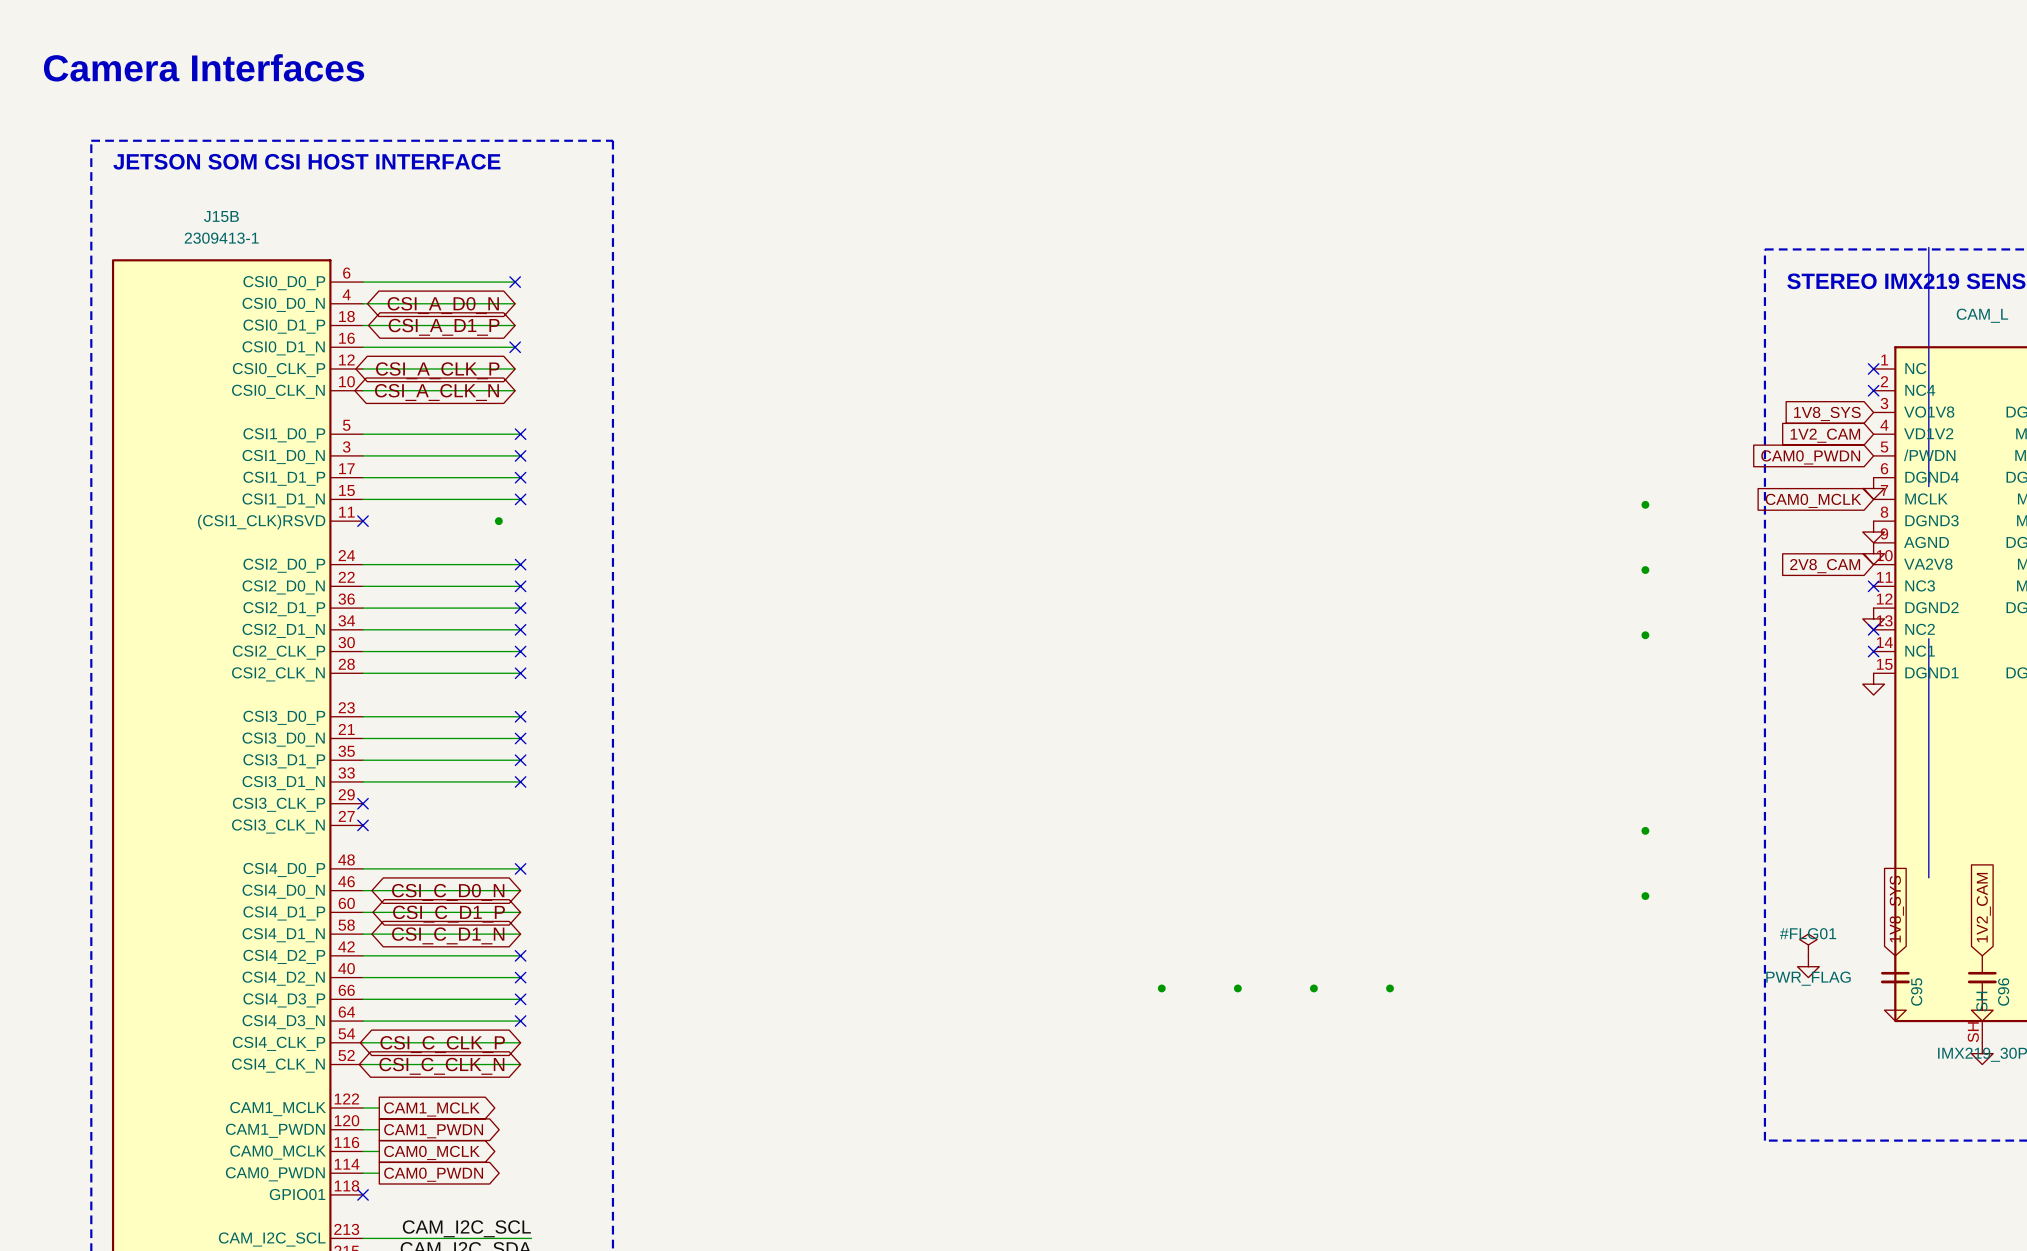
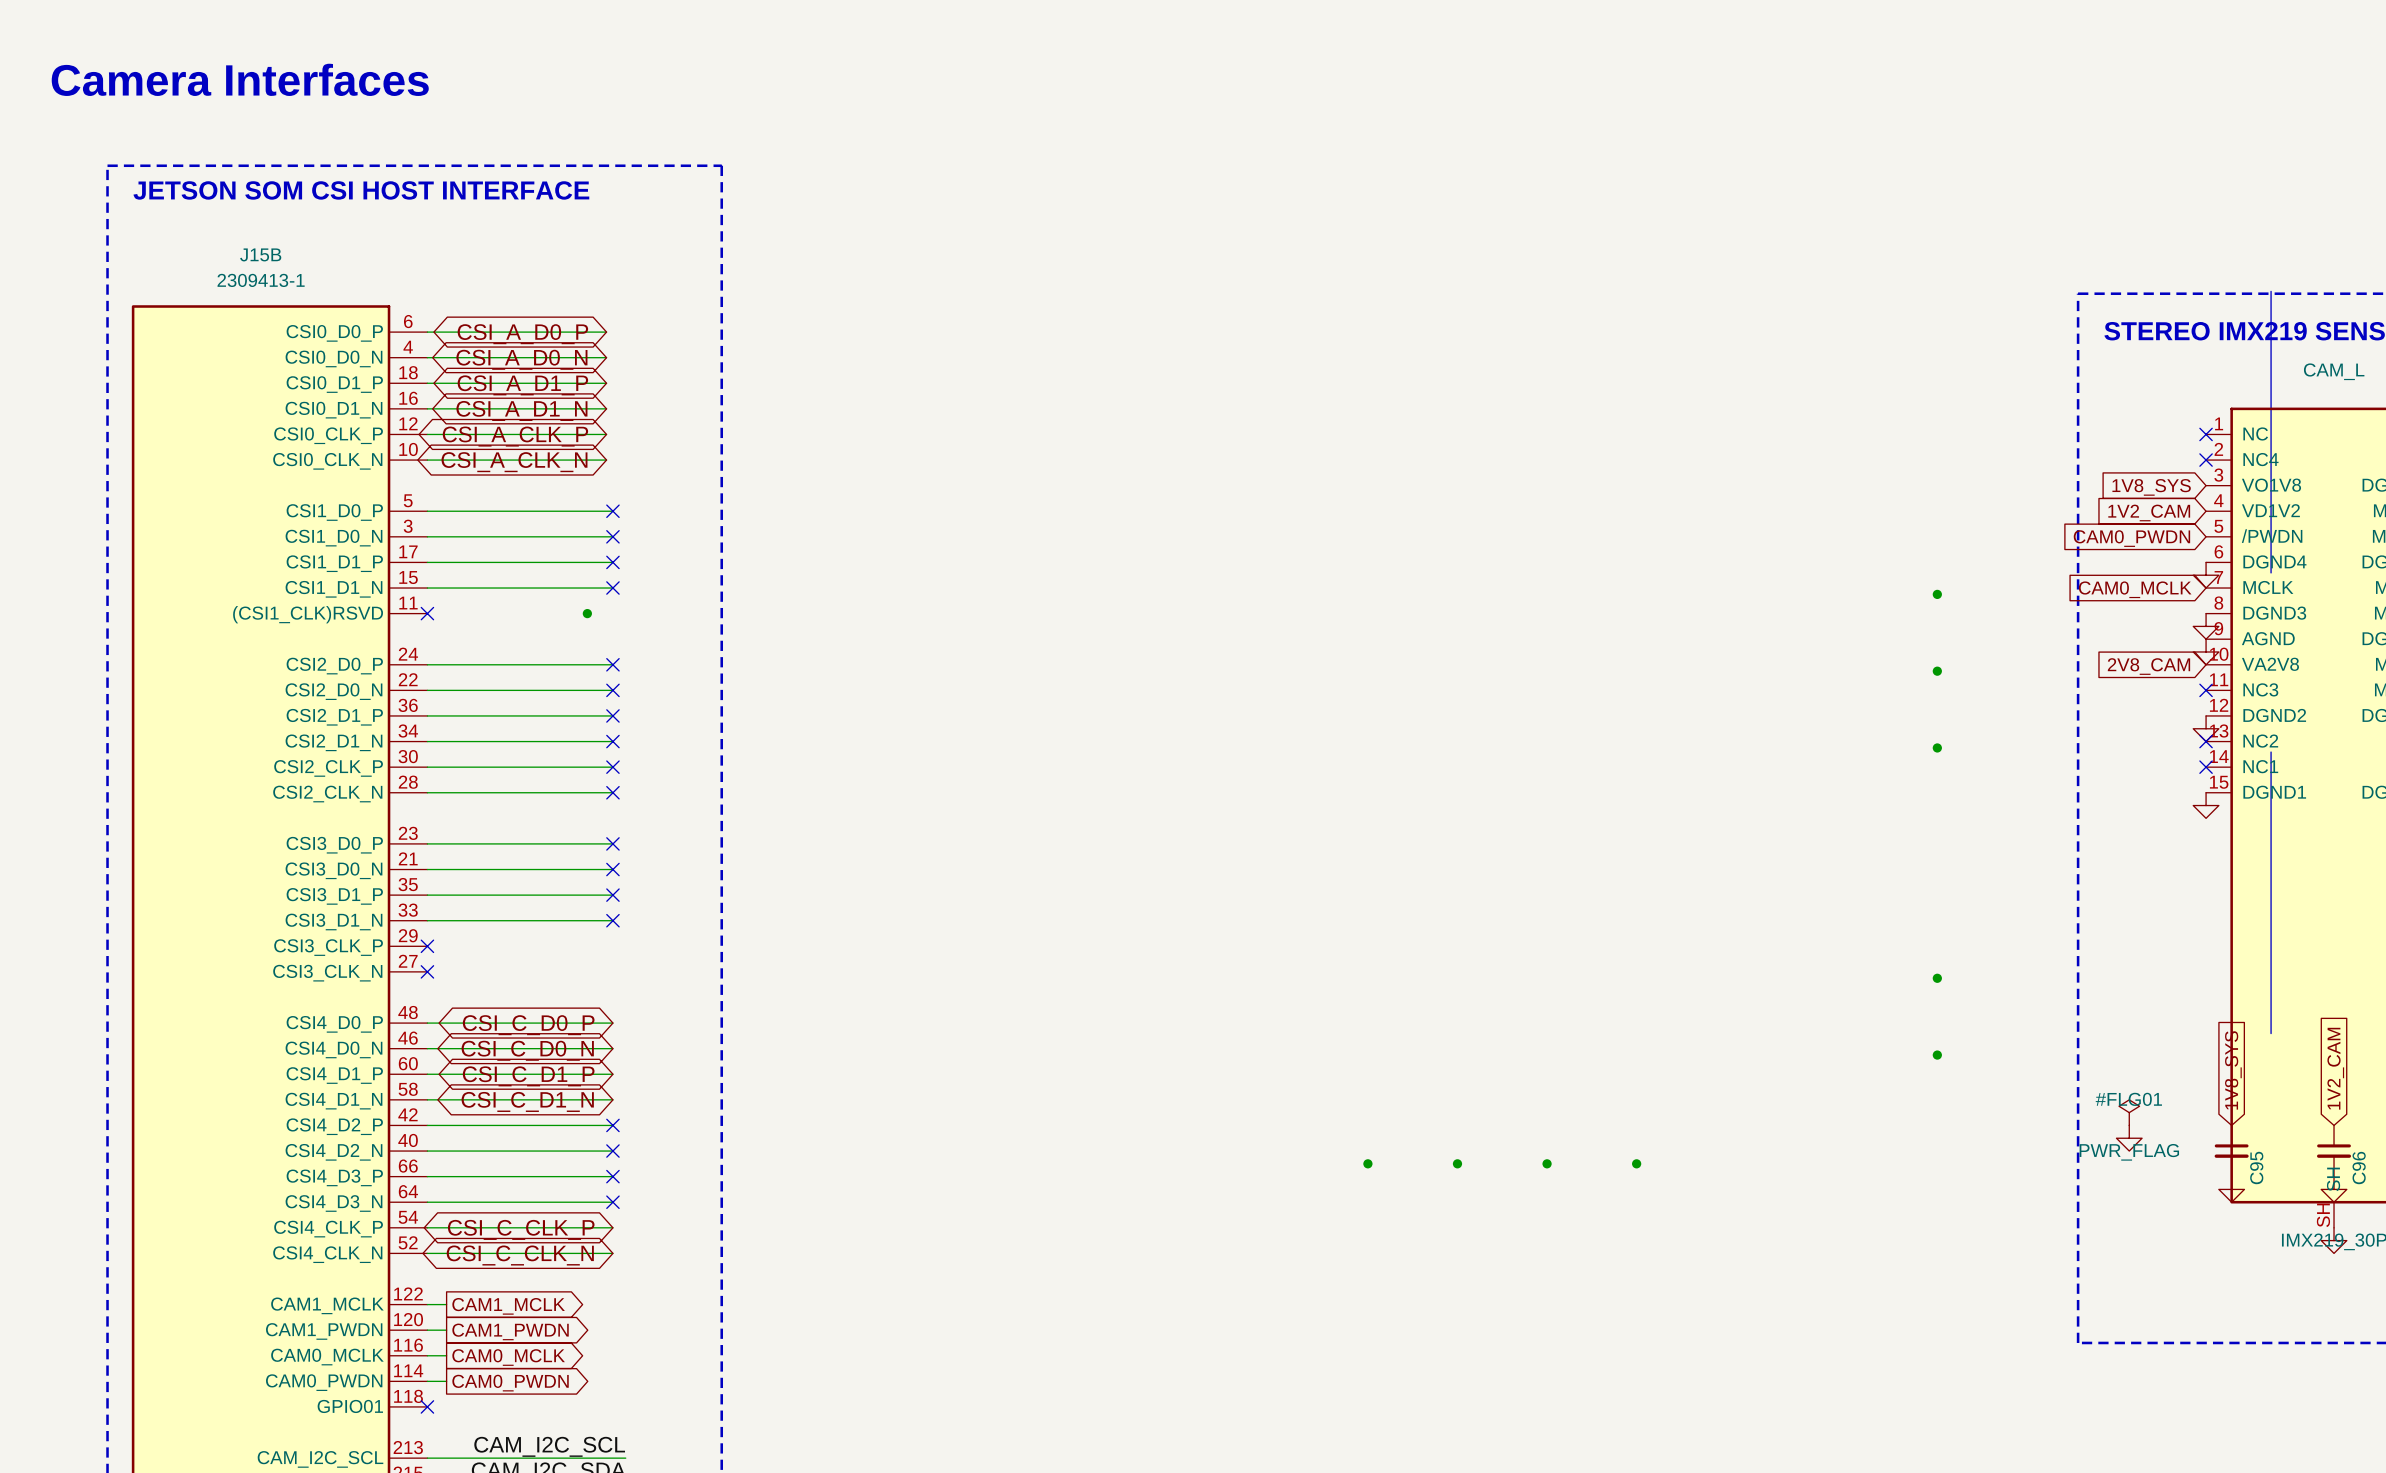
no-connect mark: (515, 282) -> none
global label: none -> CSI_A_D0_P (522, 334)
no-connect mark: (515, 347) -> none
global label: none -> CSI_A_D1_N (521, 410)
no-connect mark: (520, 868) -> none
global label: none -> CSI_C_D0_P (528, 1025)

